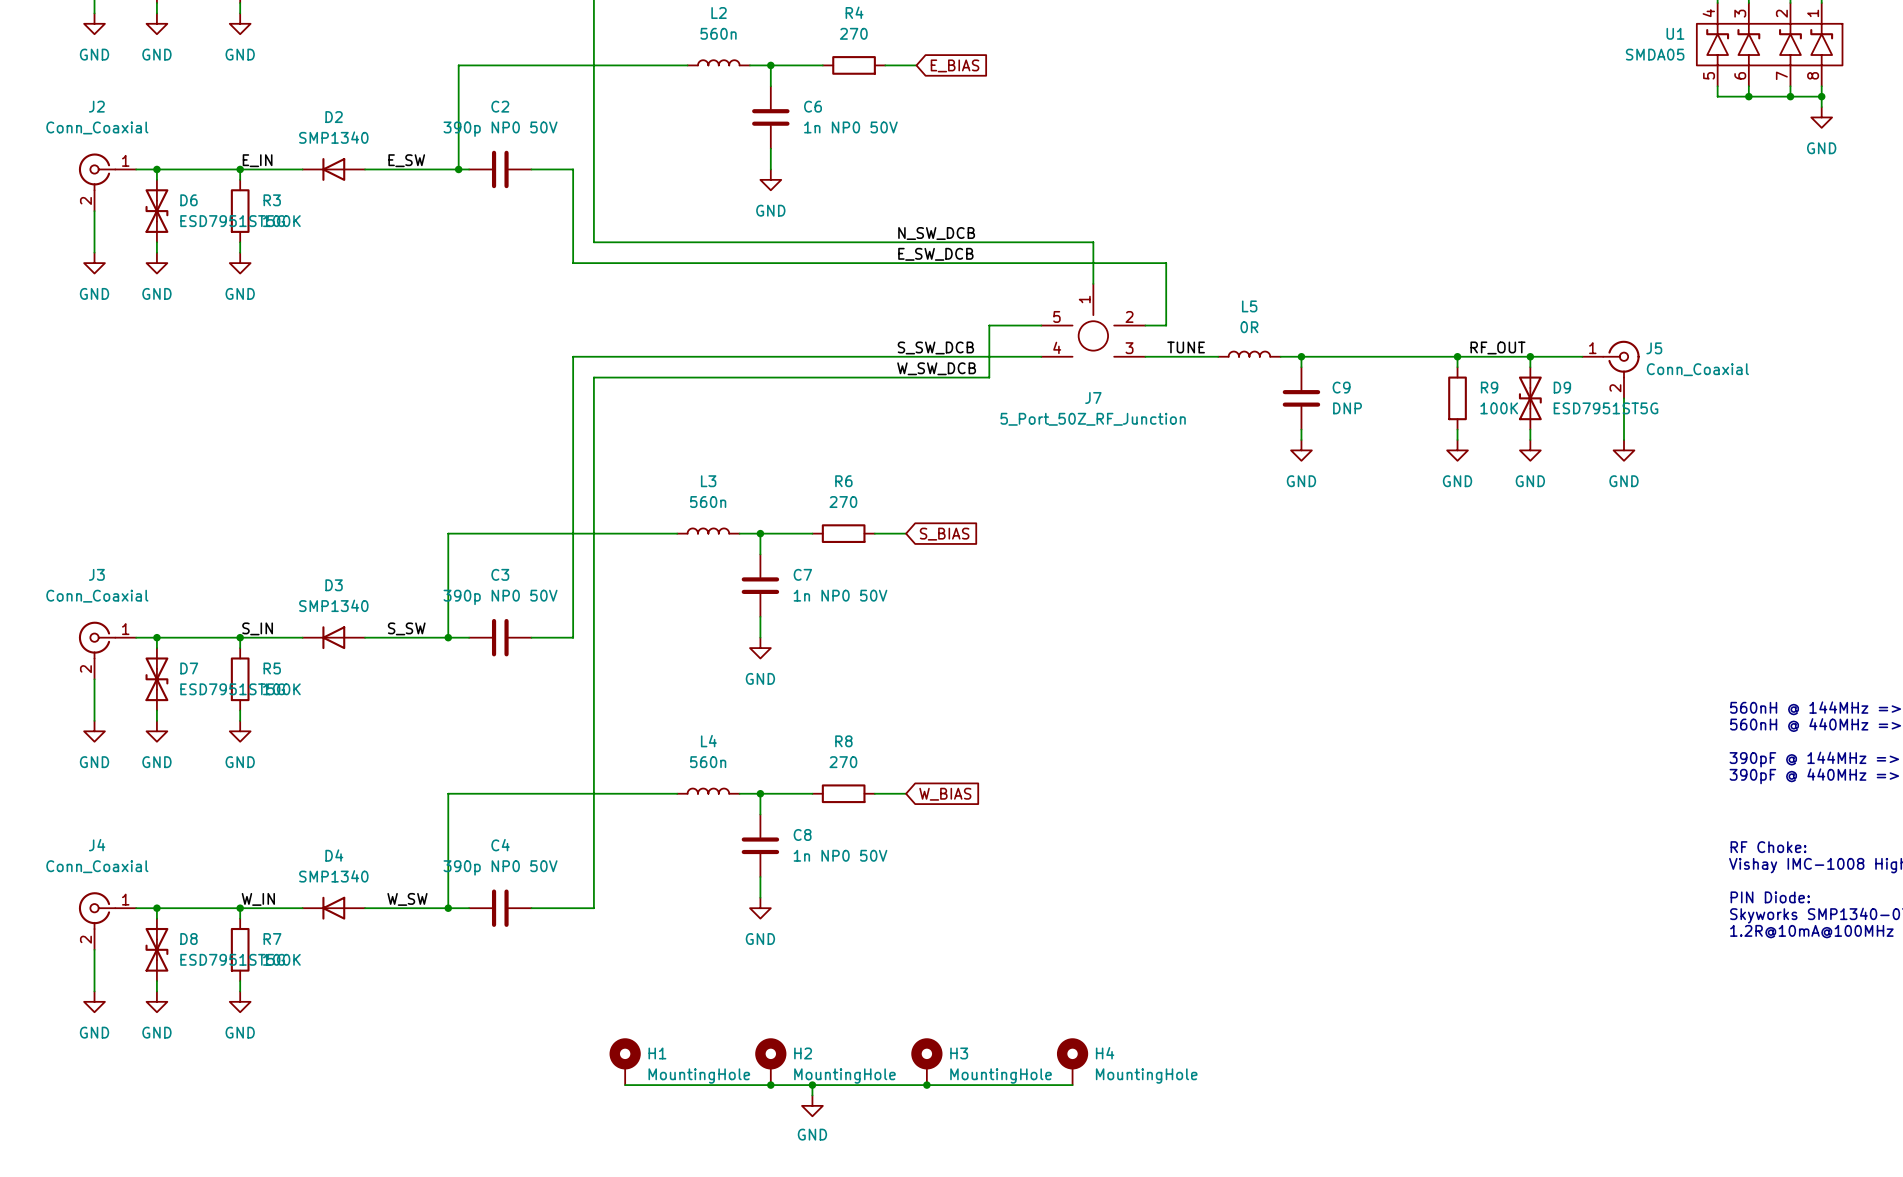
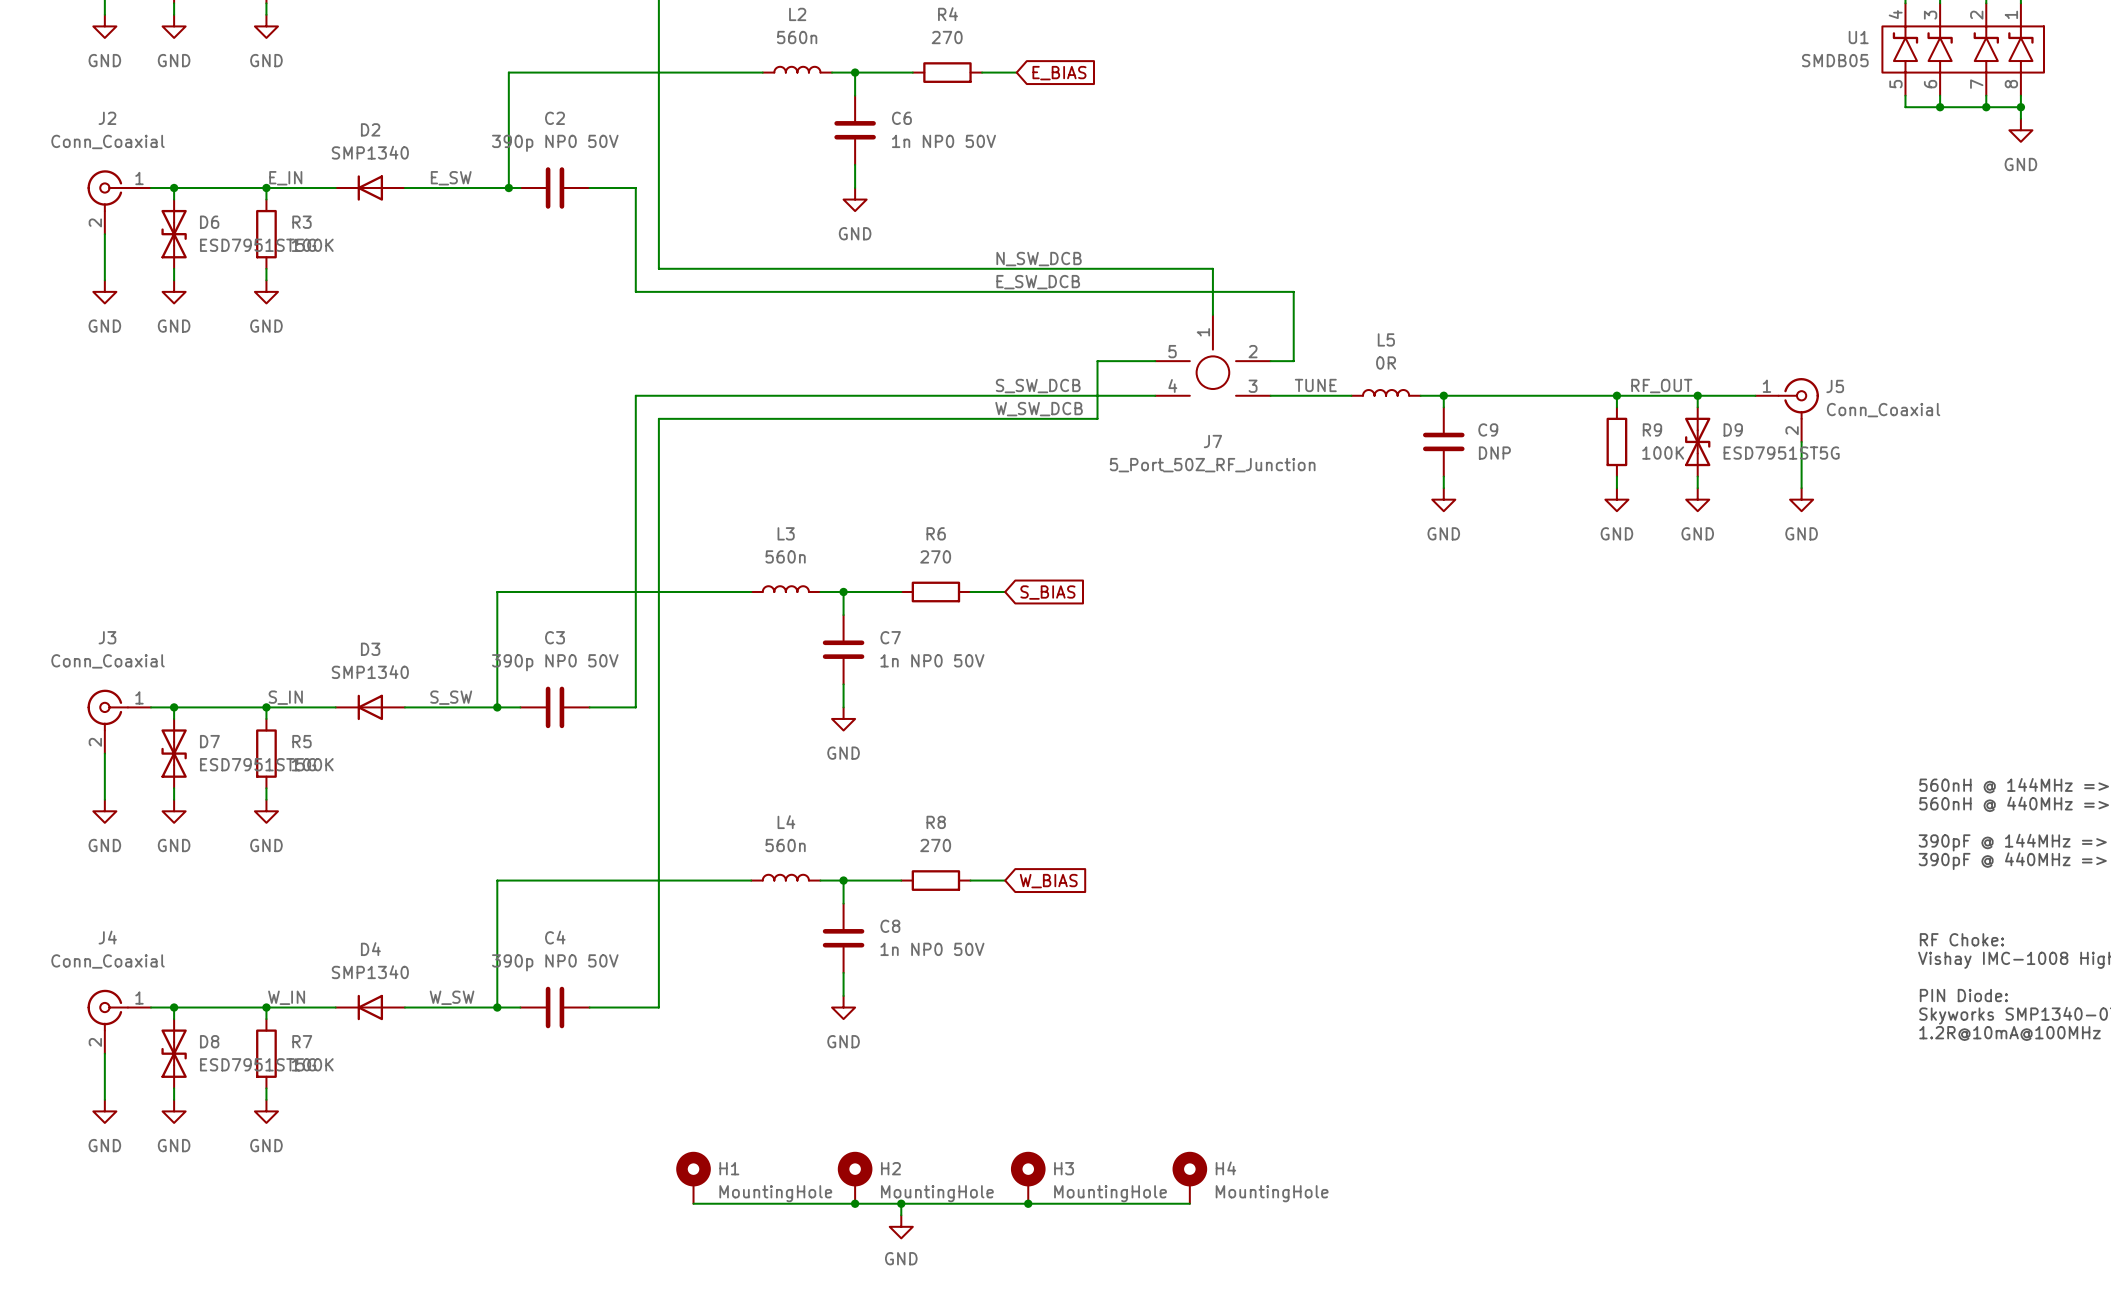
U1 value: SMDA05 (1655, 54) -> SMDB05 (1835, 60)

